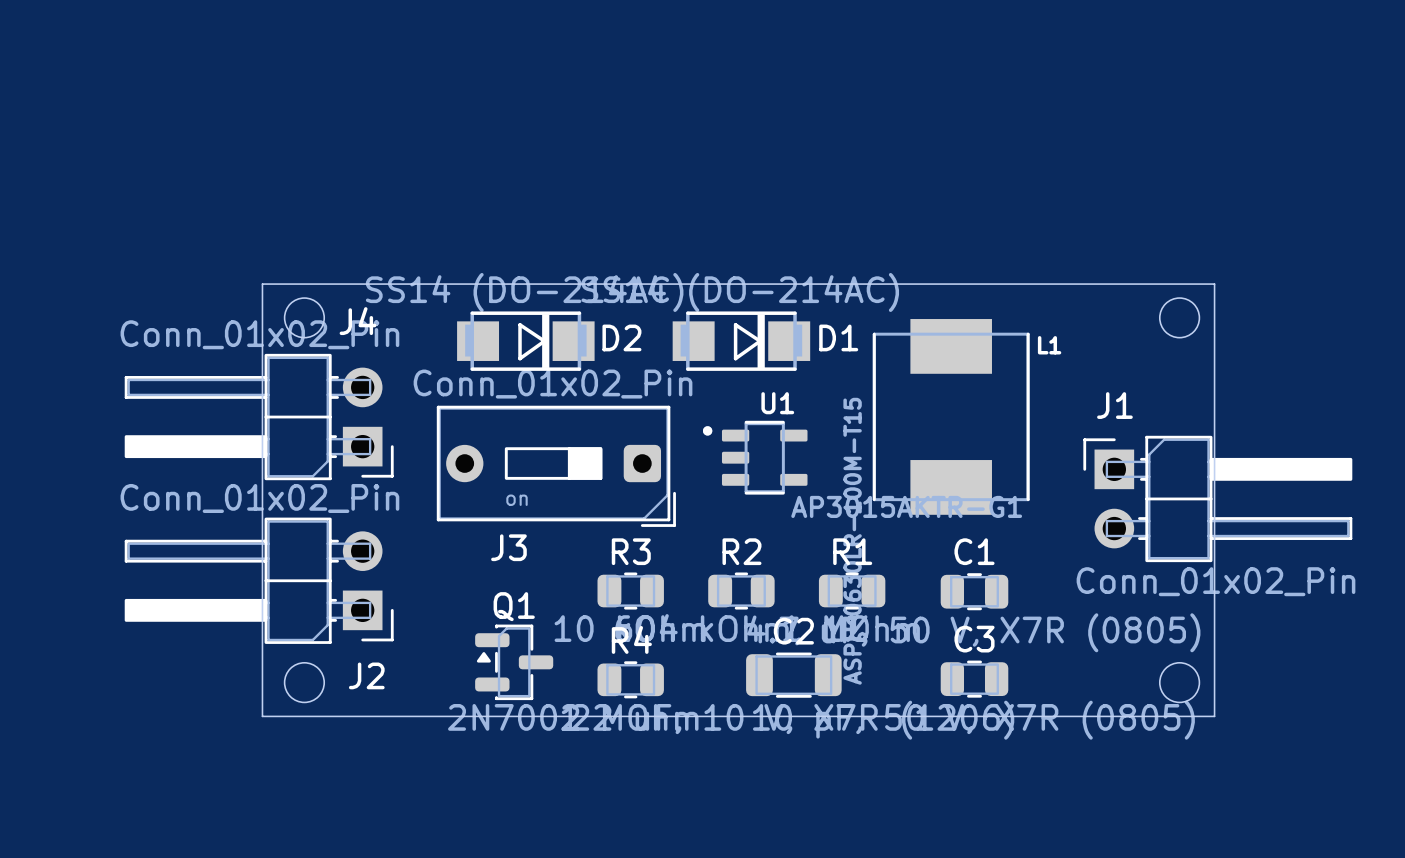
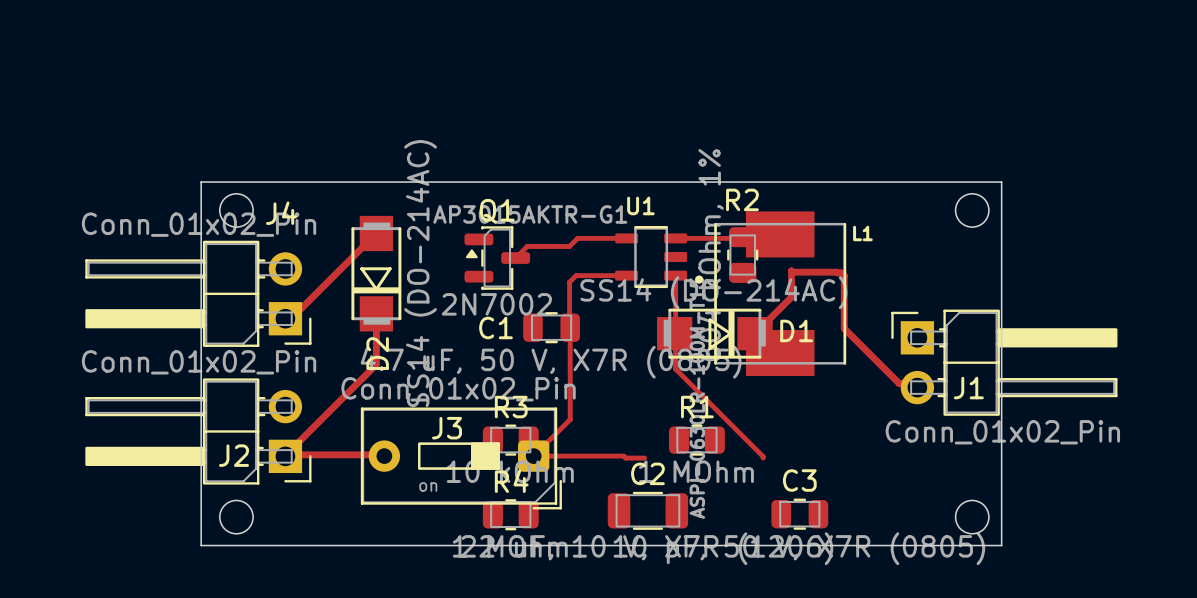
D2 rotation: 0° (525, 341) -> 90° clockwise (376, 273)
D1 position: (741, 341) -> (714, 333)
track: none -> (375, 232) (291, 318) (288, 318)
track: none -> (624, 236) (626, 238) (577, 238) (569, 246) (527, 246) (515, 258)
track: none -> (742, 237) (675, 238)
track: none -> (626, 275) (576, 275) (569, 282) (569, 314)
track: none -> (675, 275) (675, 329)
J1 name position: J1 (1114, 405) -> J1 (968, 388)
track: none -> (376, 313) (376, 364) (286, 454) (384, 456)
track: none -> (570, 327) (570, 419) (533, 456) (623, 456) (625, 458) (644, 458)
U1 rotation: 0° (755, 457) -> 180° (659, 257)
U1 position: (755, 457) -> (659, 257)
track: none -> (755, 330) (755, 333) (791, 297) (791, 270) (841, 272) (844, 275) (844, 328) (899, 383) (916, 383)
track: none -> (674, 333) (675, 369) (763, 458)
J3 position: (556, 466) -> (461, 458)
J3 name position: J3 (508, 547) -> J3 (446, 428)
C1 name position: C1 (974, 551) -> C1 (496, 327)
R2 rotation: 0° (741, 591) -> 90° clockwise (742, 255)
R2 position: (741, 591) -> (742, 255)
C1 position: (974, 591) -> (551, 327)
Q1 position: (514, 662) -> (497, 258)
J2 name position: J2 (366, 675) -> J2 (234, 455)

